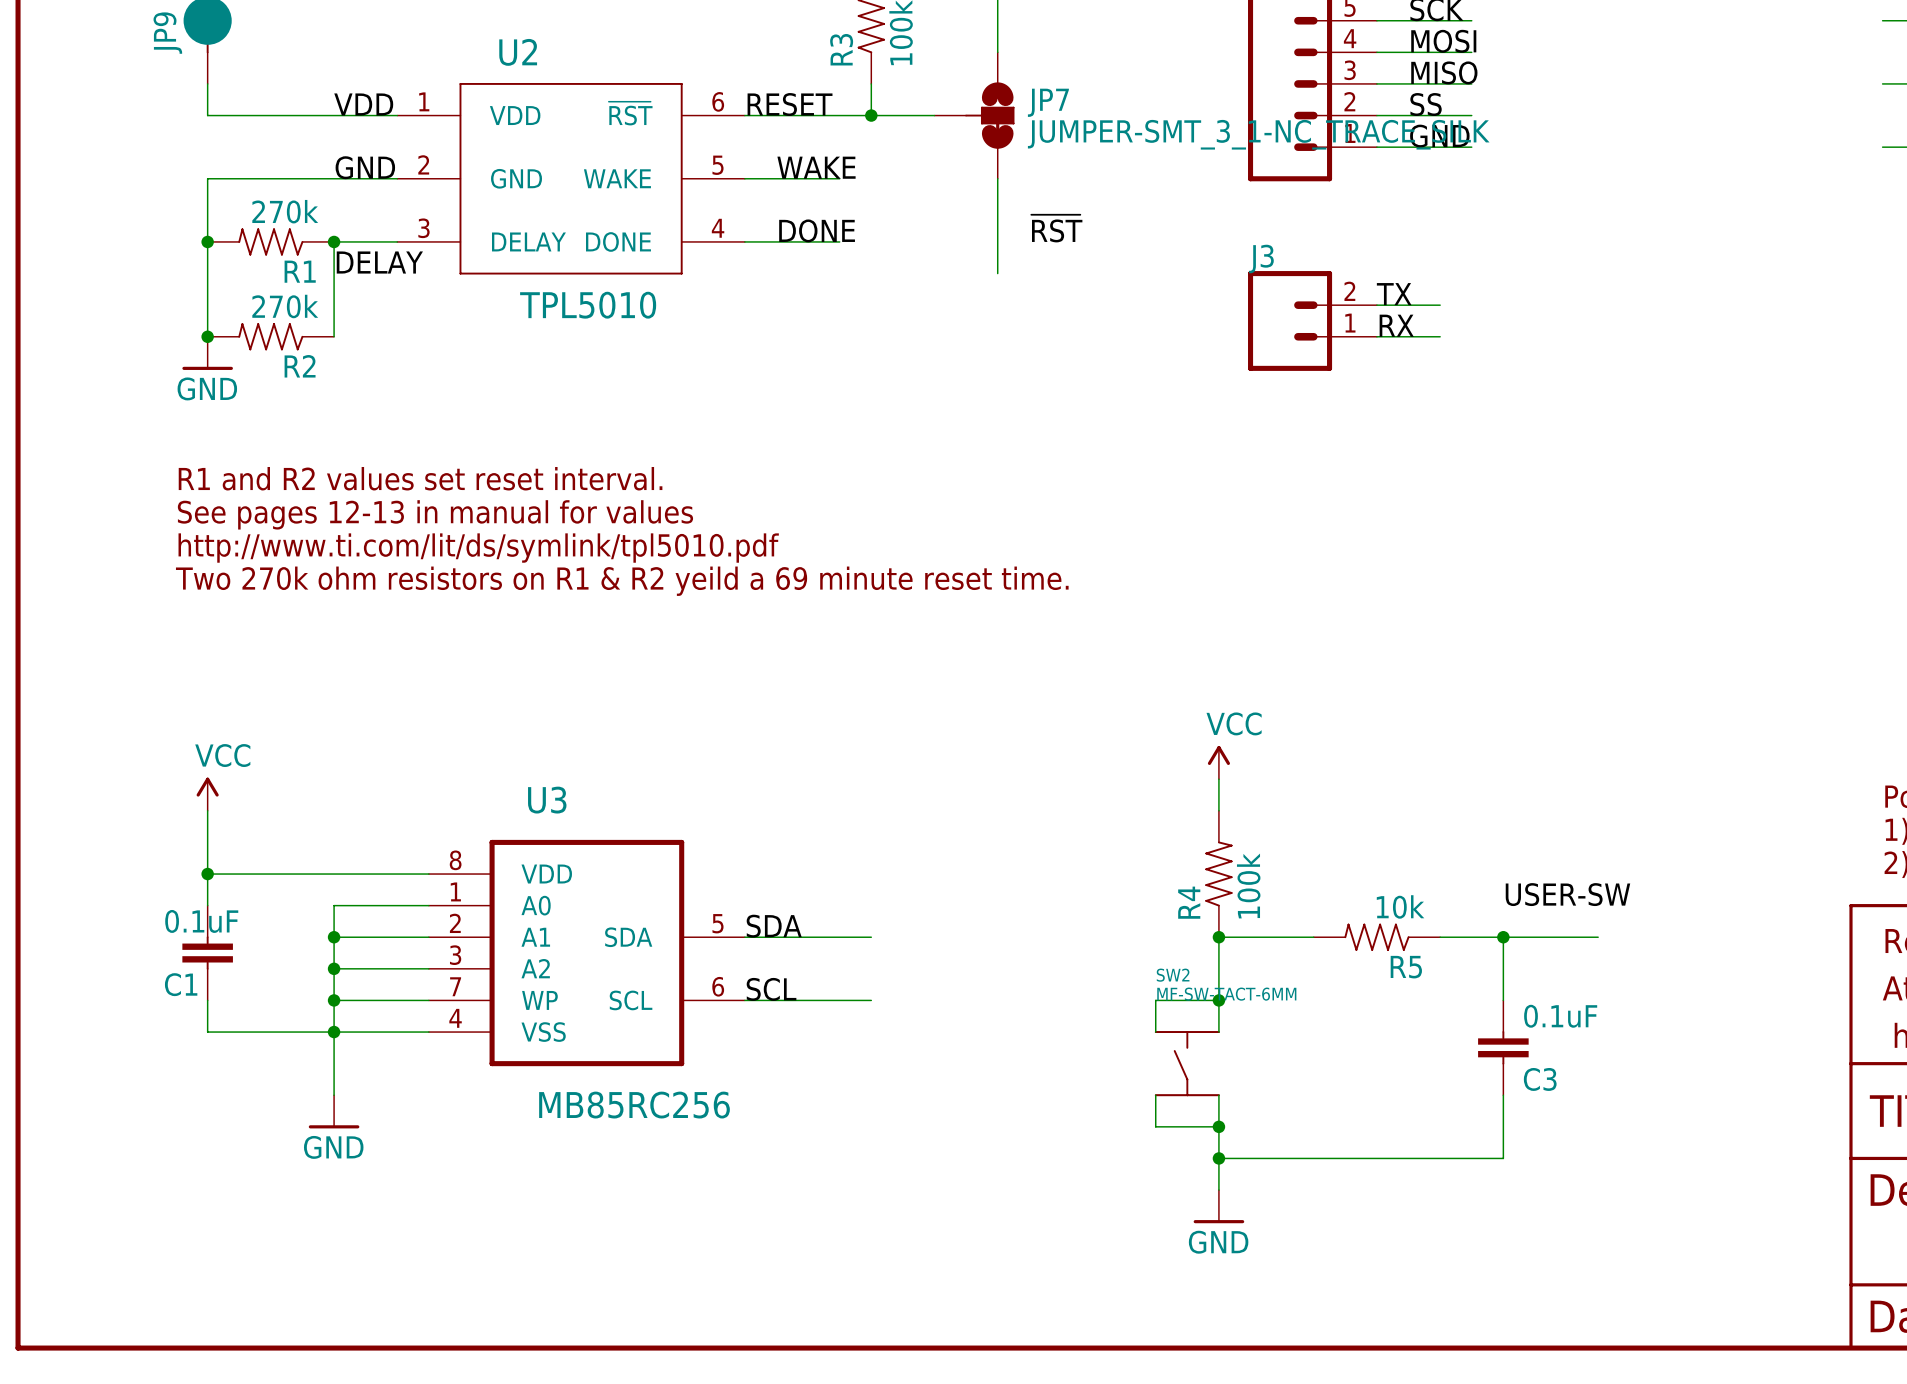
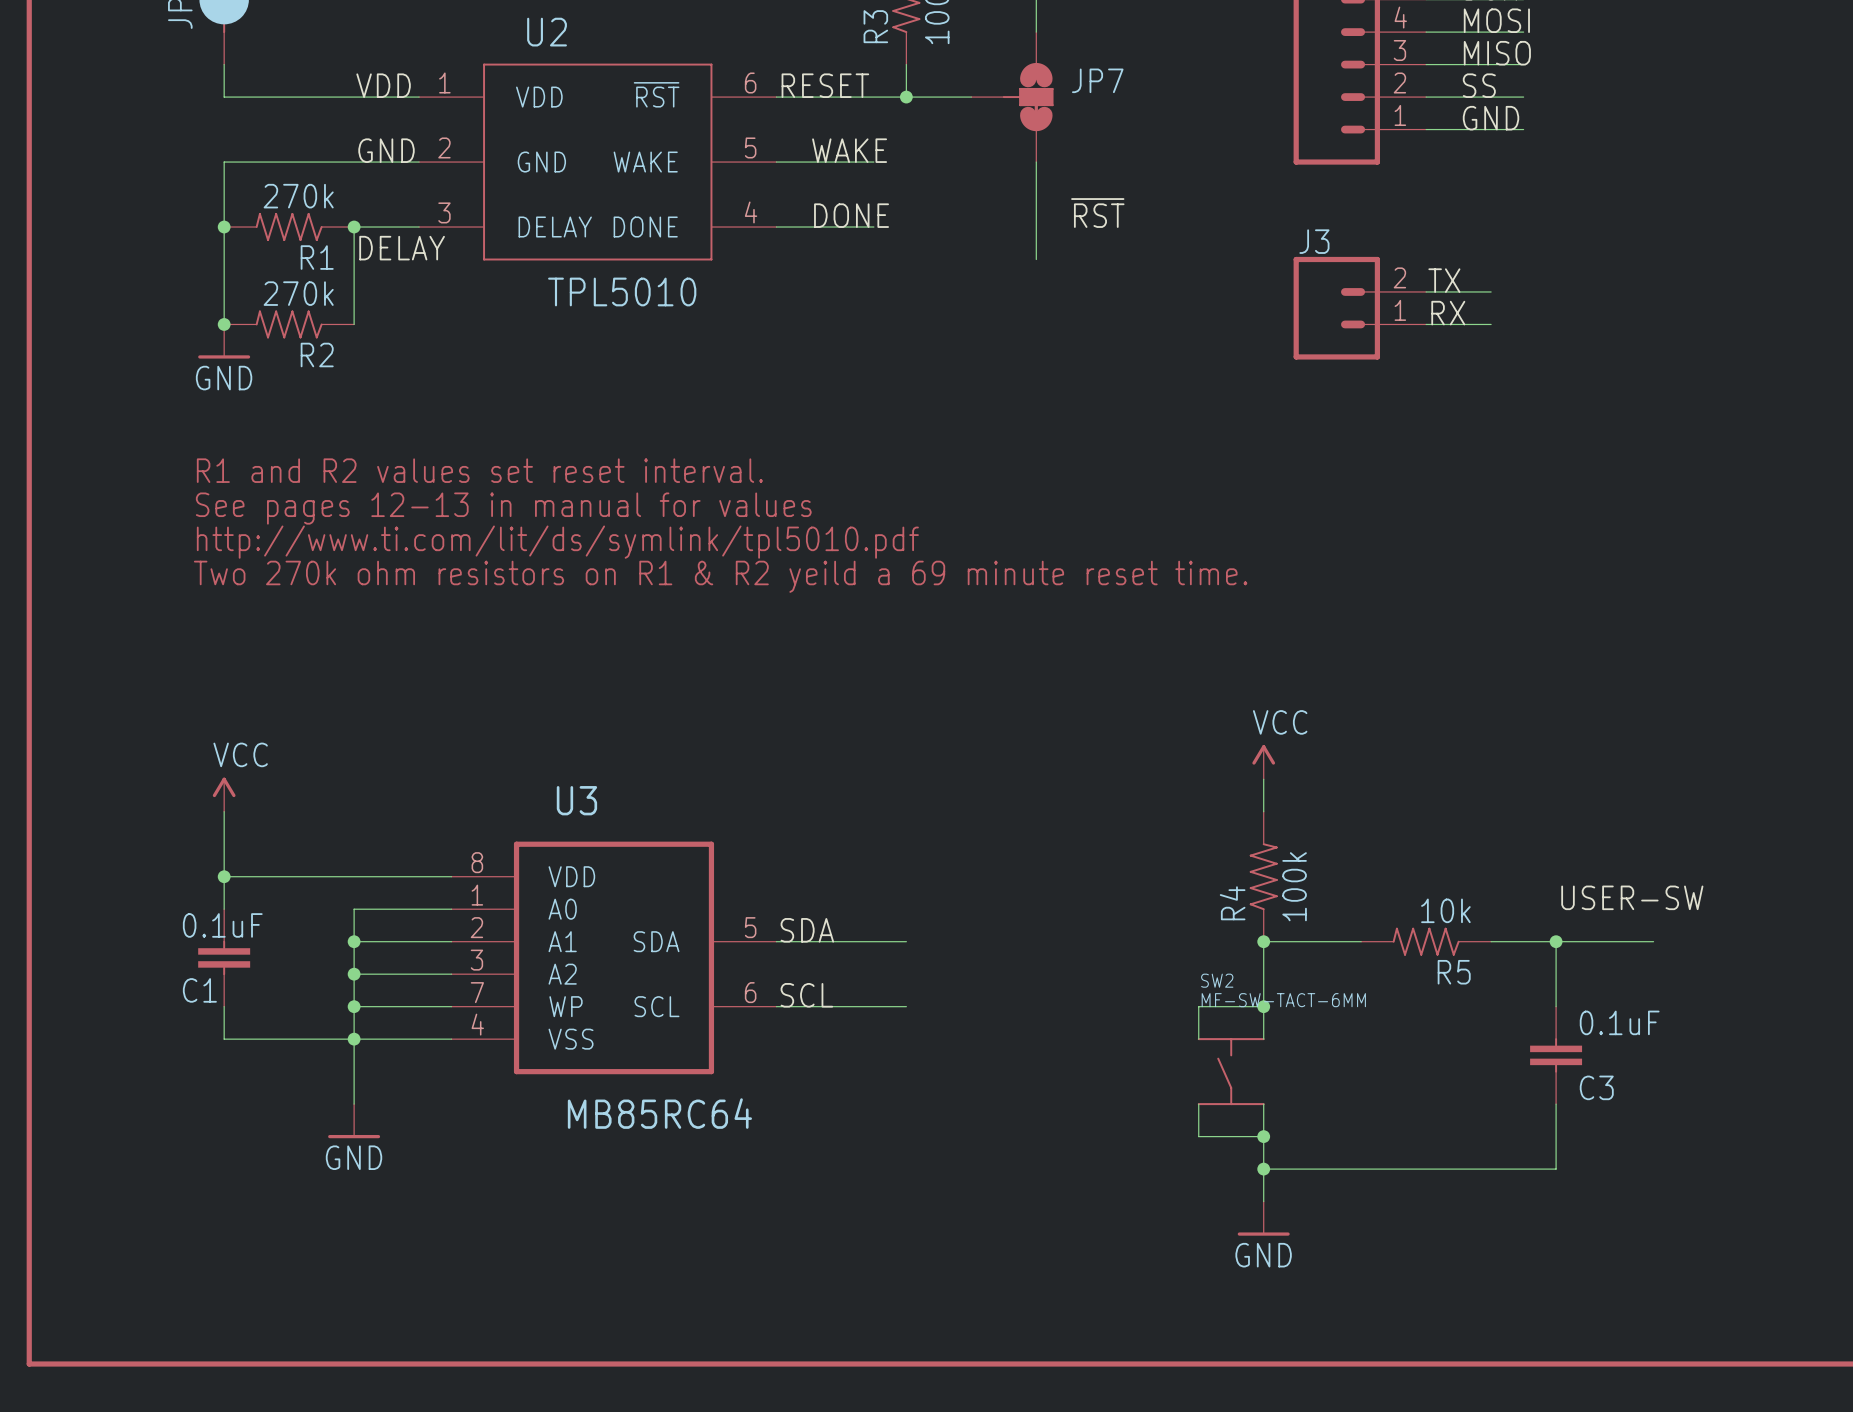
JP7 value: JUMPER-SMT_3_1-NC_TRACE_SILK (1258, 134) -> none
U3 value: MB85RC256 (634, 1105) -> MB85RC64 (659, 1113)

